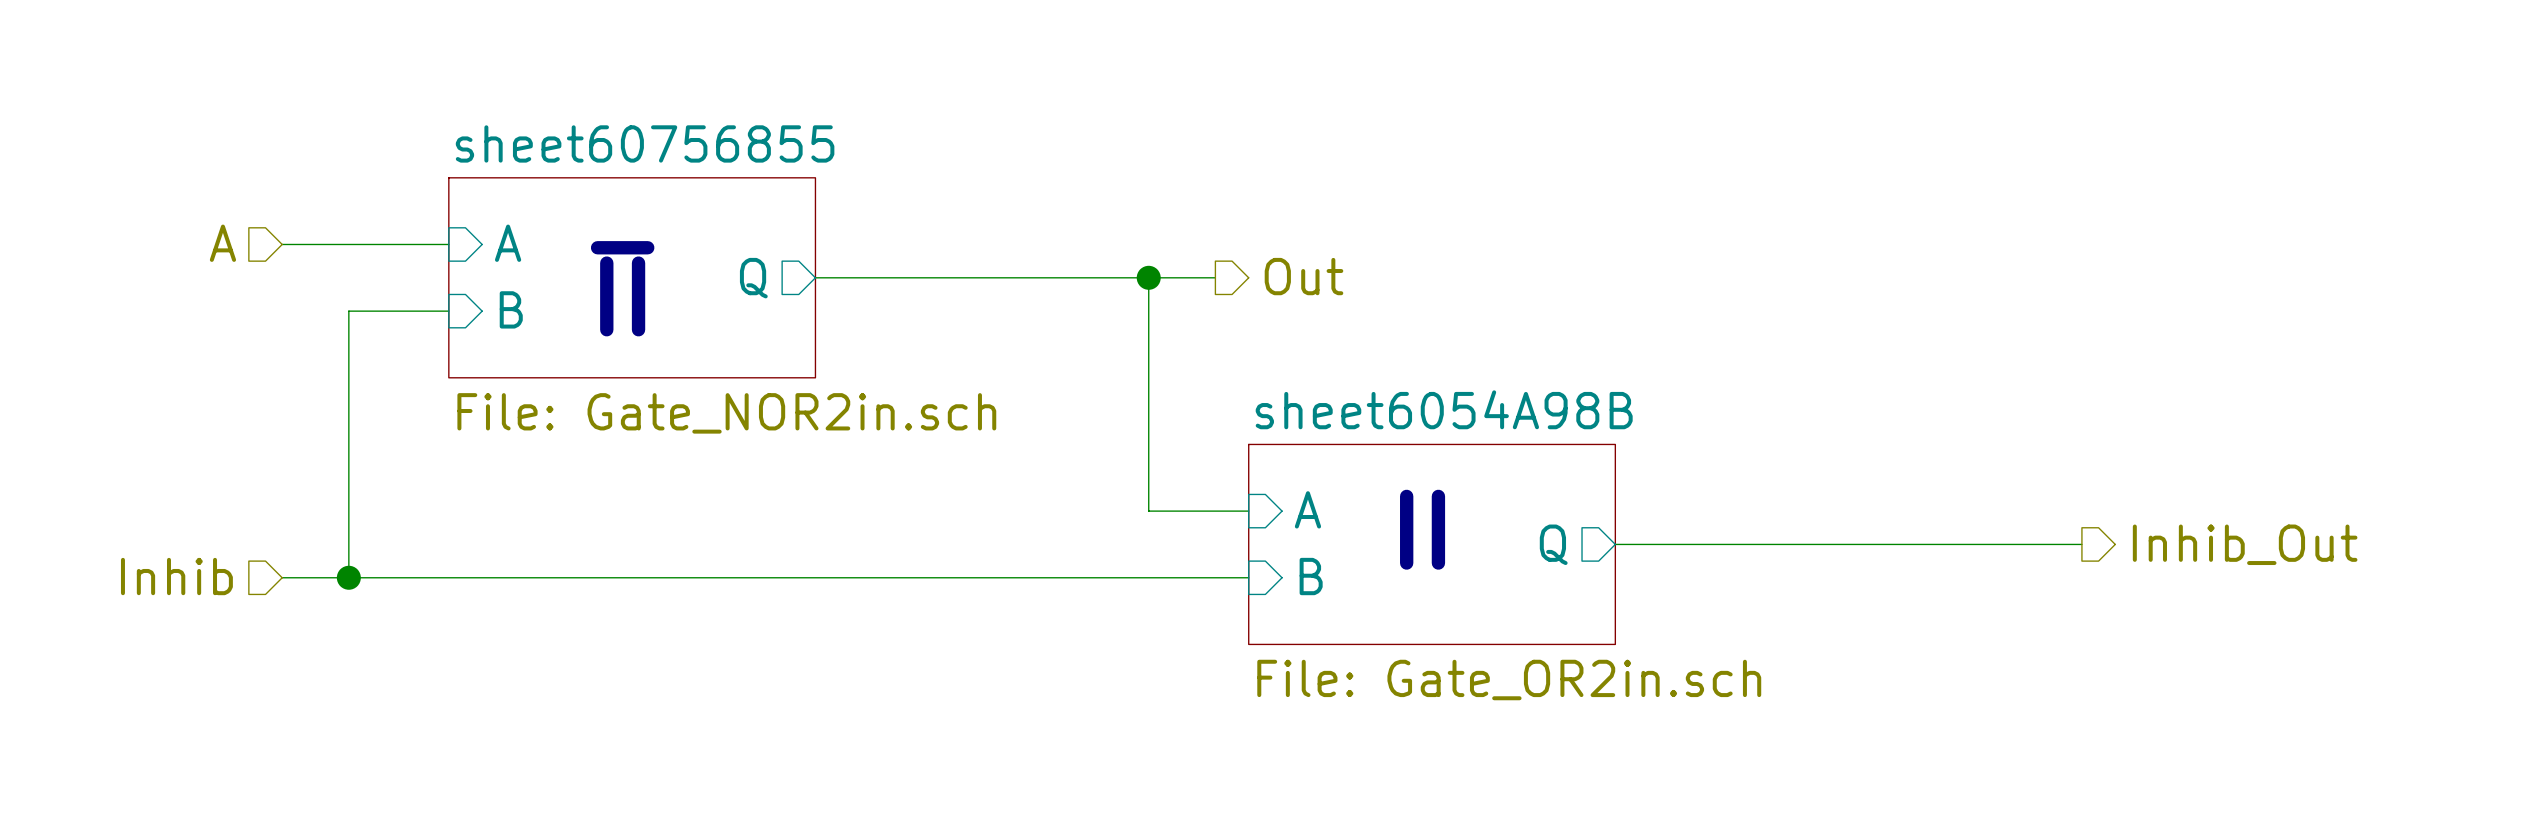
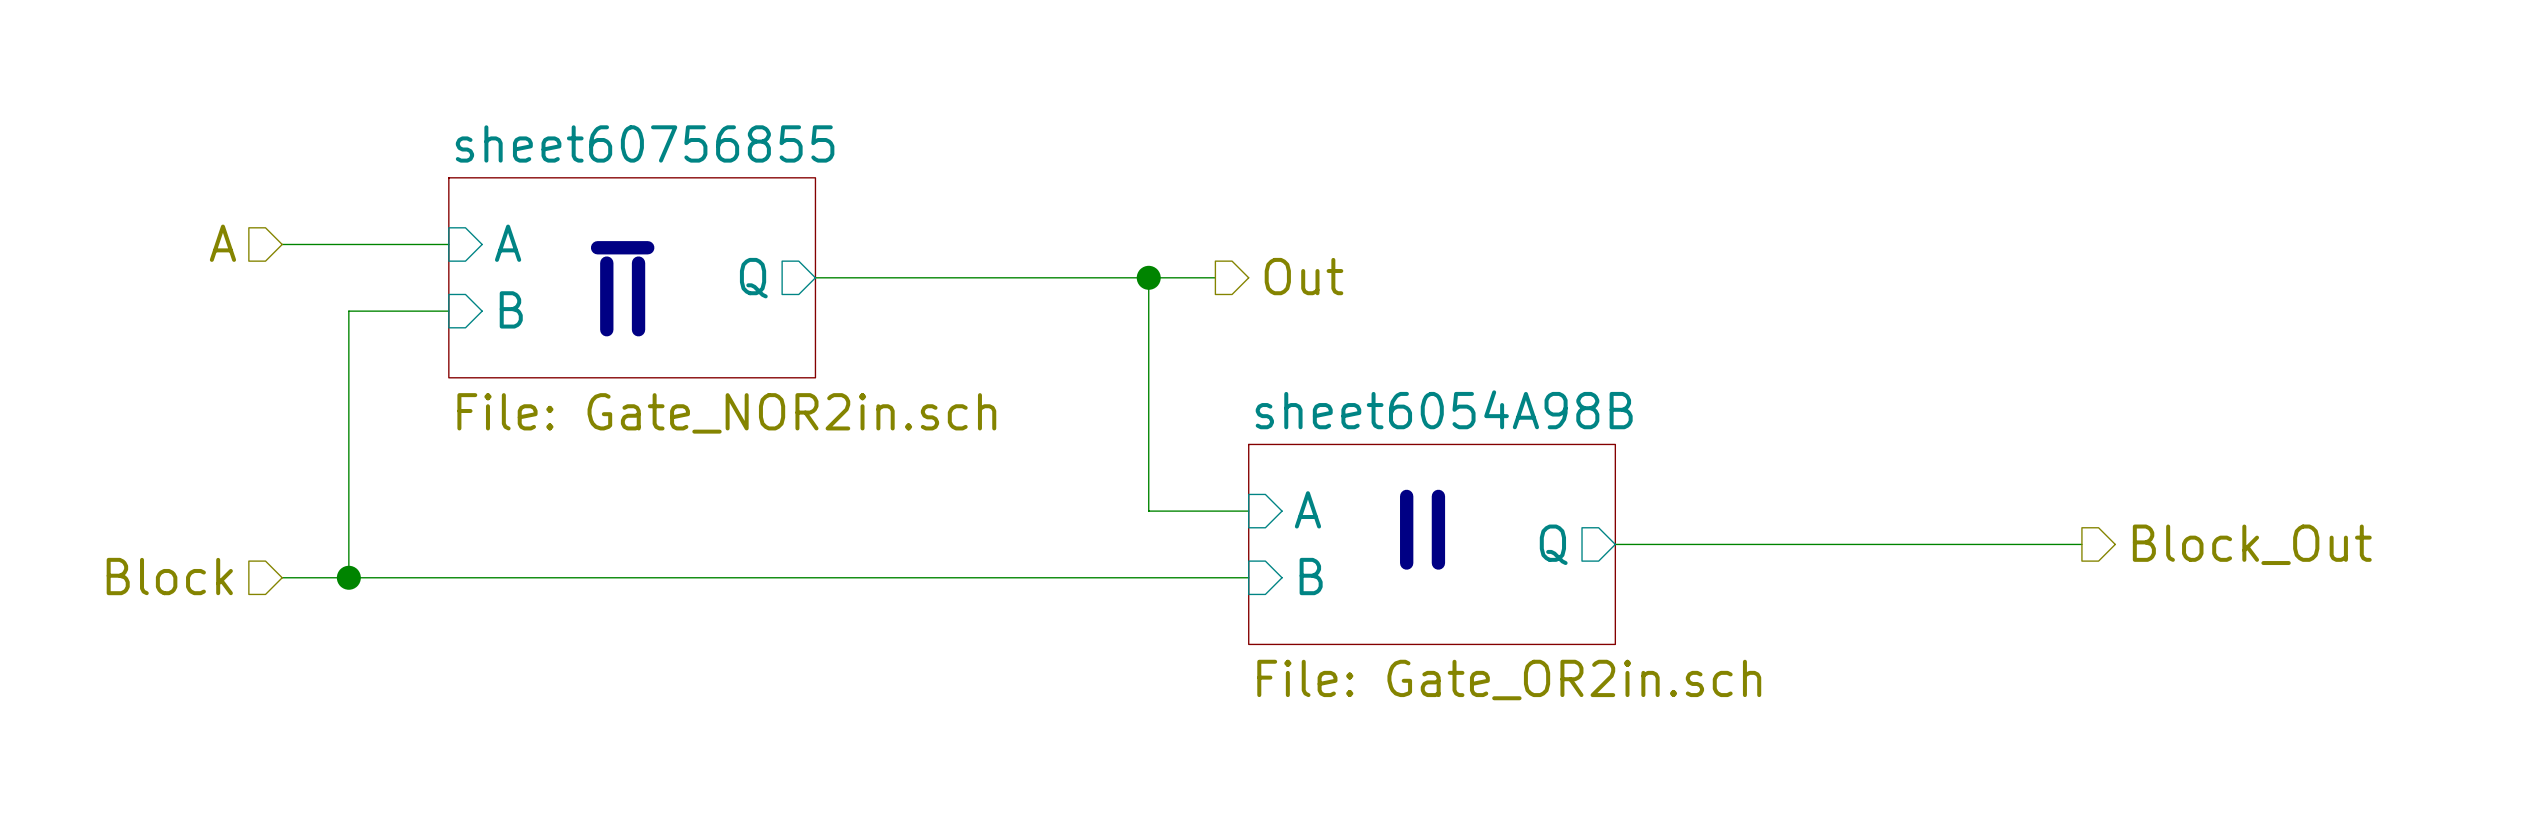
hierarchical label: Inhib_Out (2245, 544) -> Block_Out (2252, 544)
hierarchical label: Inhib (176, 576) -> Block (169, 576)

